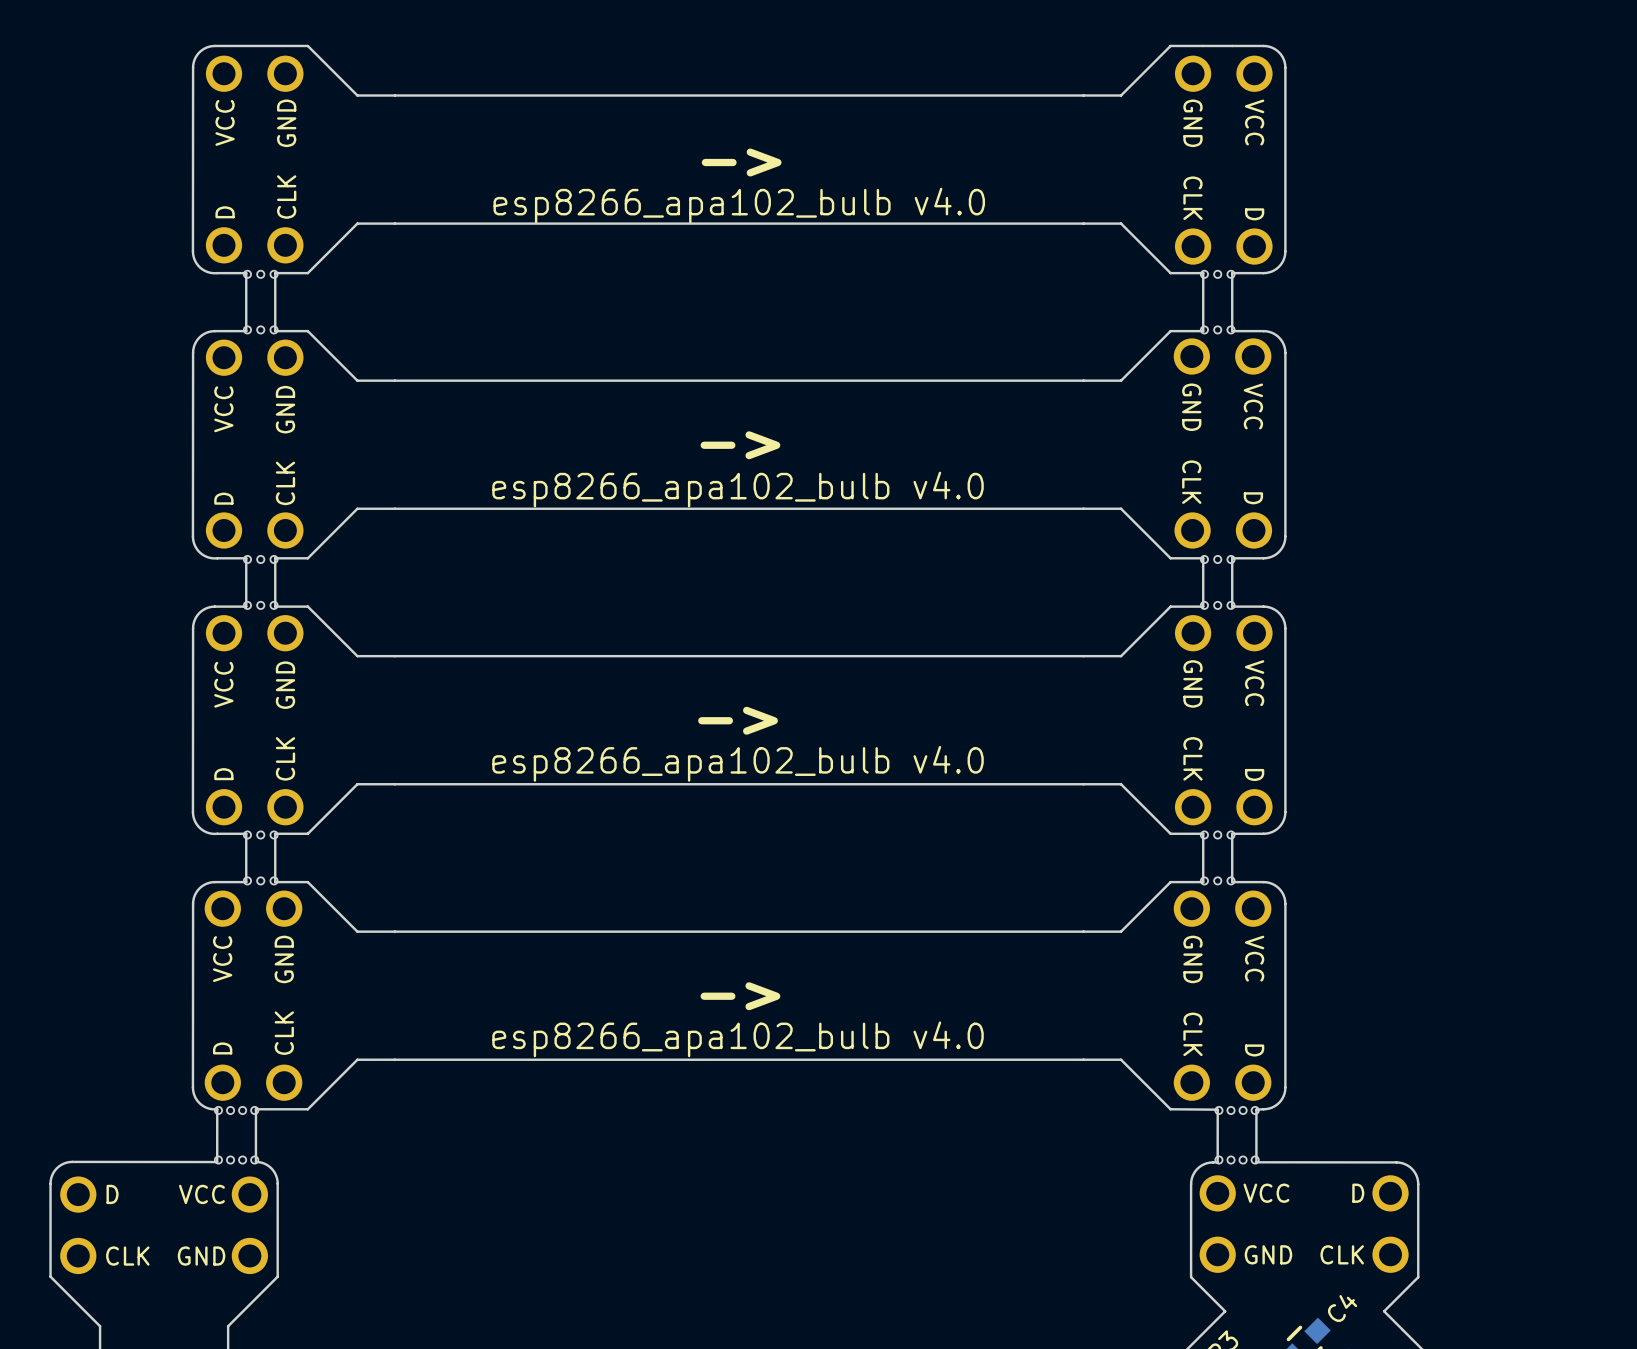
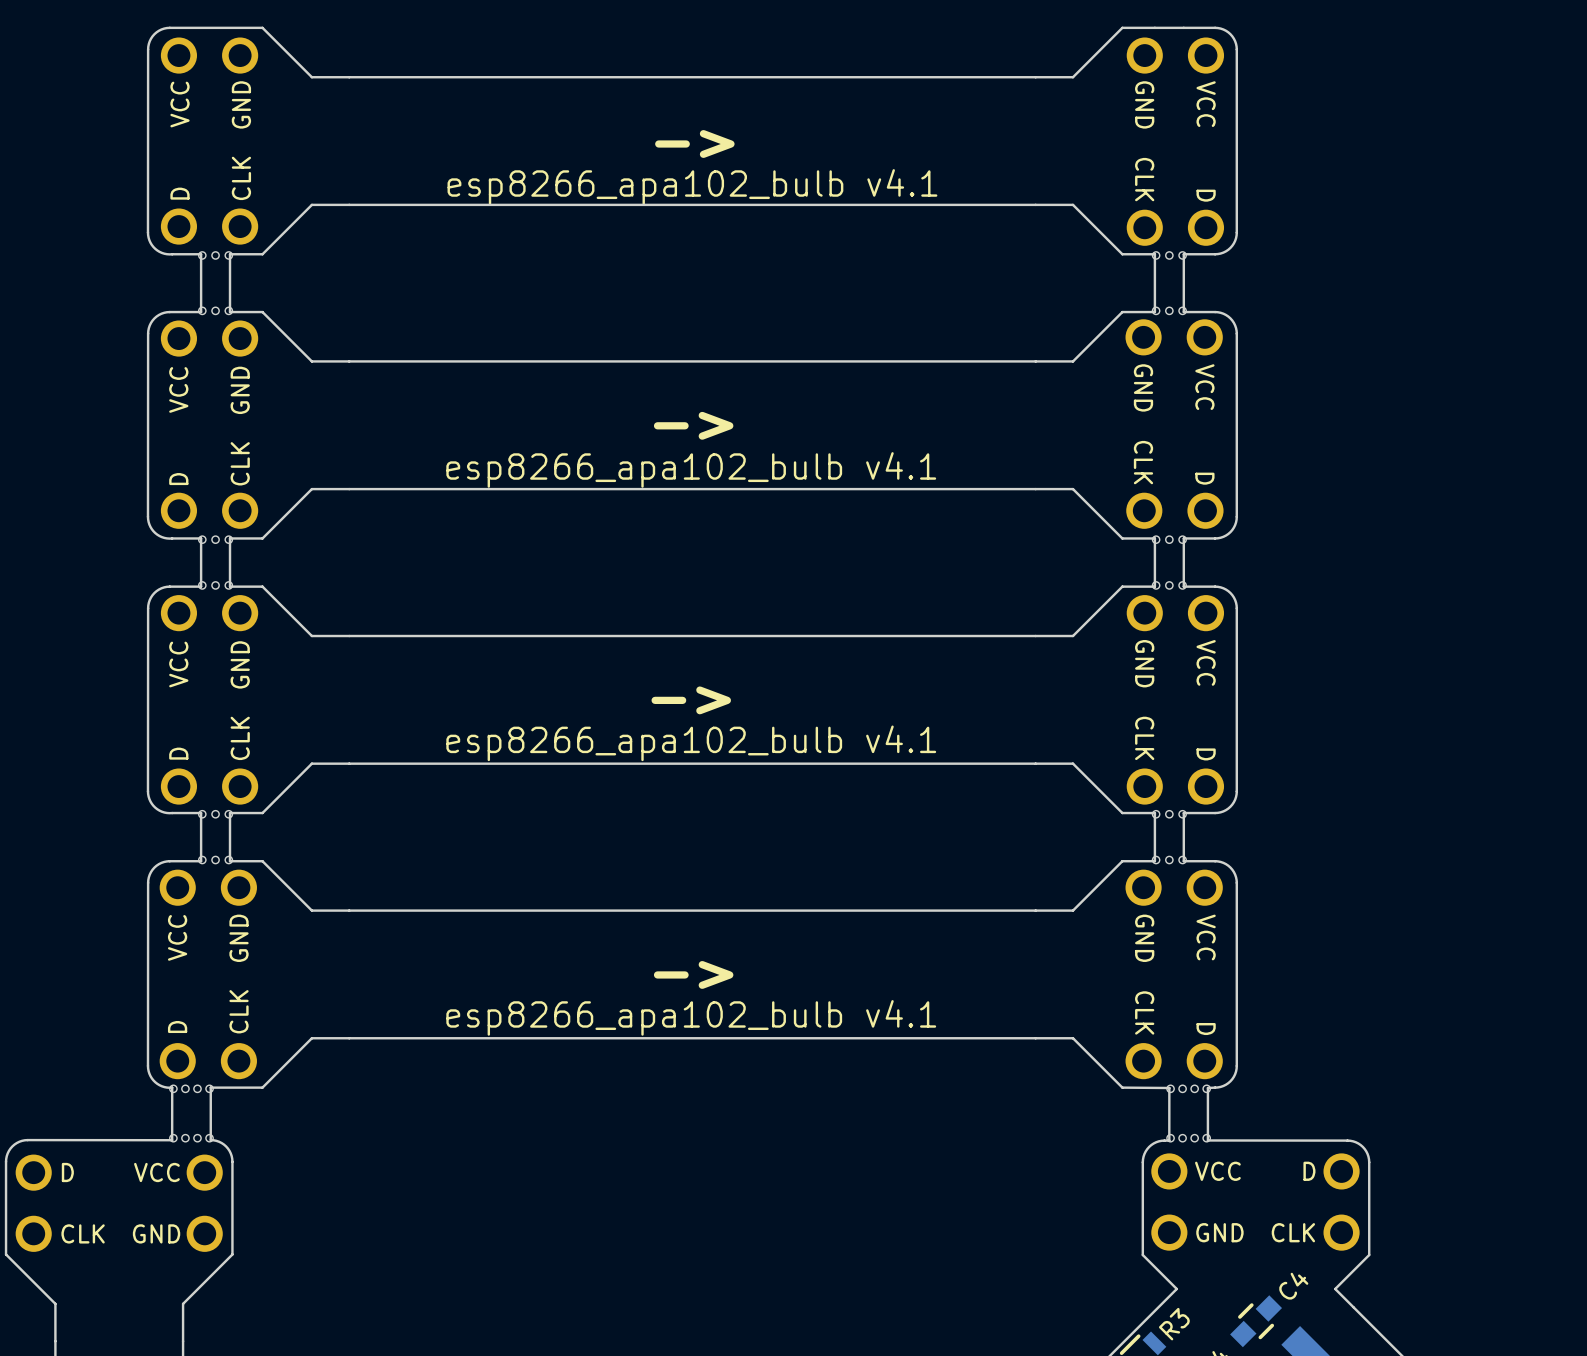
text: esp8266_apa102_bulb v4.0 (739, 205) -> esp8266_apa102_bulb v4.1 (692, 186)
text: esp8266_apa102_bulb v4.0 (738, 489) -> esp8266_apa102_bulb v4.1 (691, 469)
text: esp8266_apa102_bulb v4.0 (738, 763) -> esp8266_apa102_bulb v4.1 (691, 743)
text: esp8266_apa102_bulb v4.0 (738, 1039) -> esp8266_apa102_bulb v4.1 (691, 1017)

